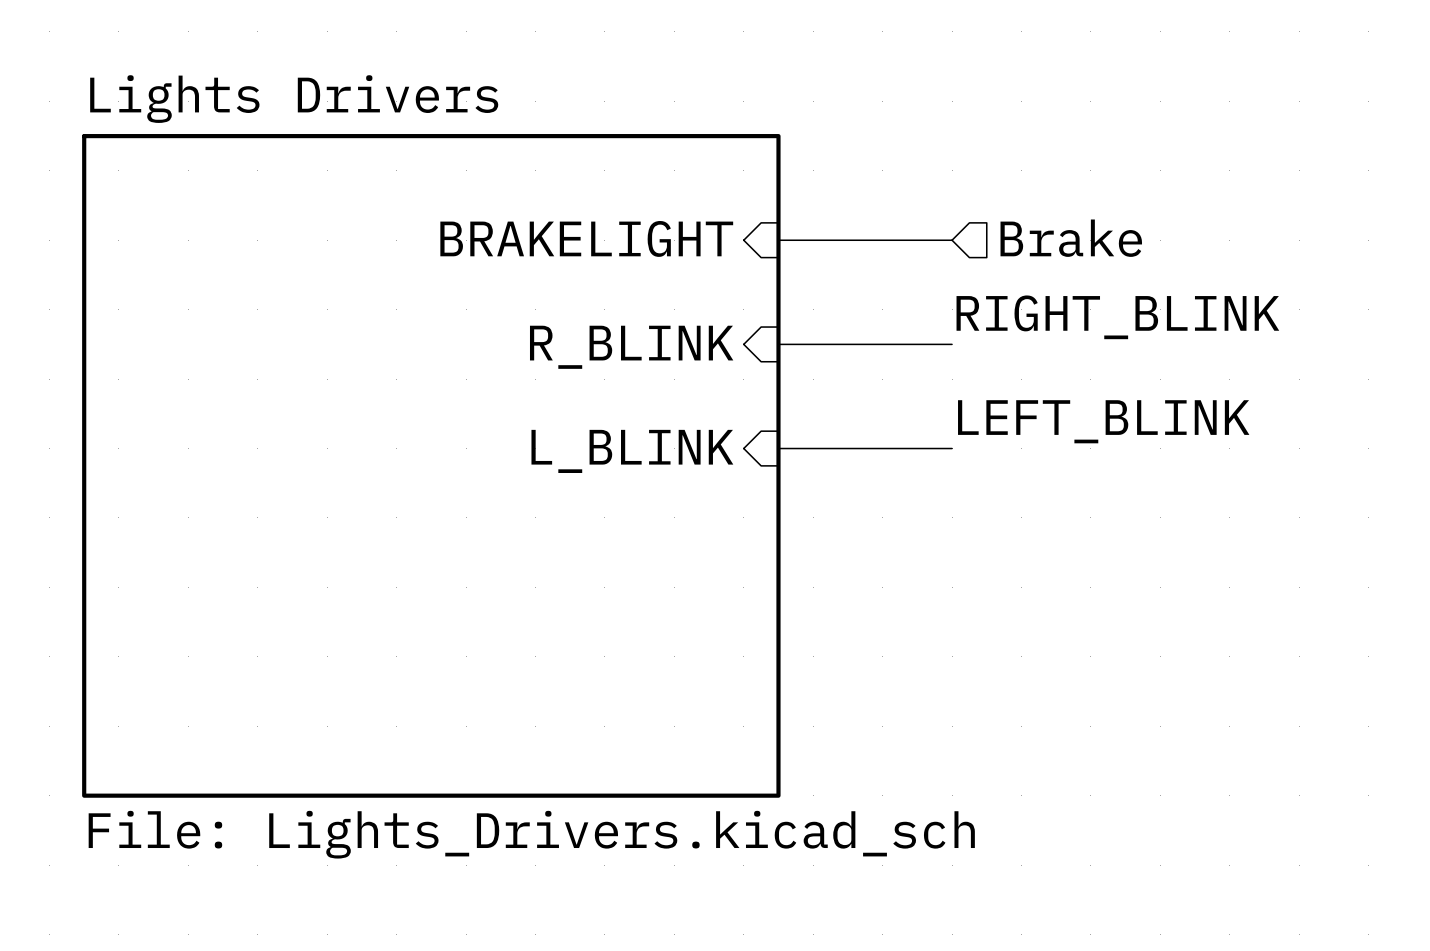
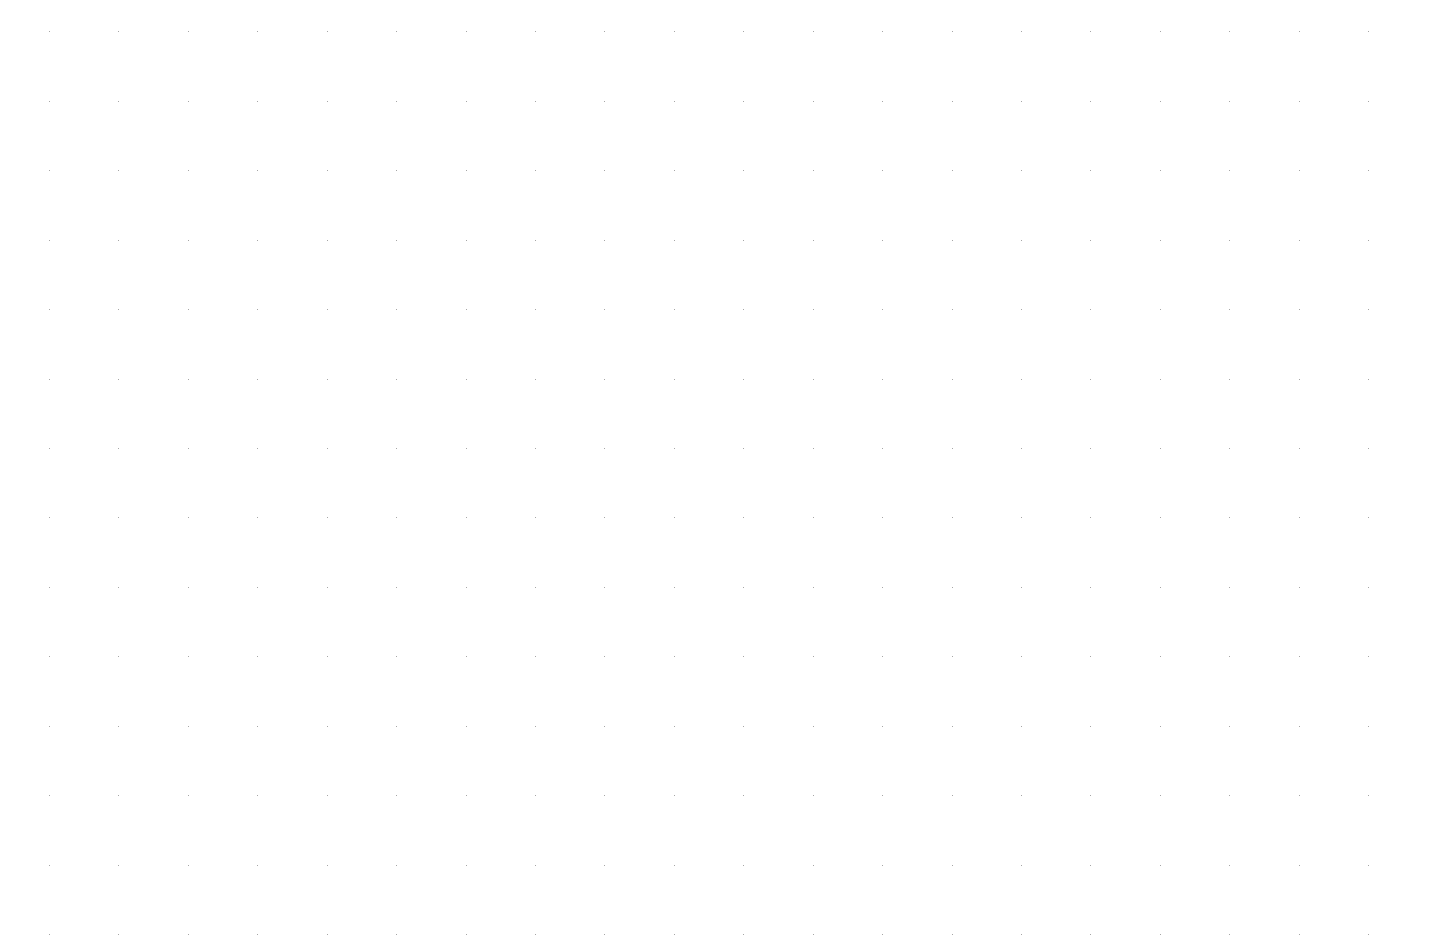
sheet pin: BRAKELIGHT (586, 238) -> none
hierarchical label: Brake (1071, 238) -> none
wire: (778, 240) (952, 240) -> none
label: RIGHT_BLINK (1117, 317) -> none
wire: (778, 344) (952, 344) -> none
sheet pin: R_BLINK (631, 347) -> none
label: LEFT_BLINK (1103, 421) -> none
wire: (778, 448) (952, 448) -> none
sheet pin: L_BLINK (632, 451) -> none
sheet Lights Drivers: File: Lights_Drivers.kicad_sch (431, 465) -> none

